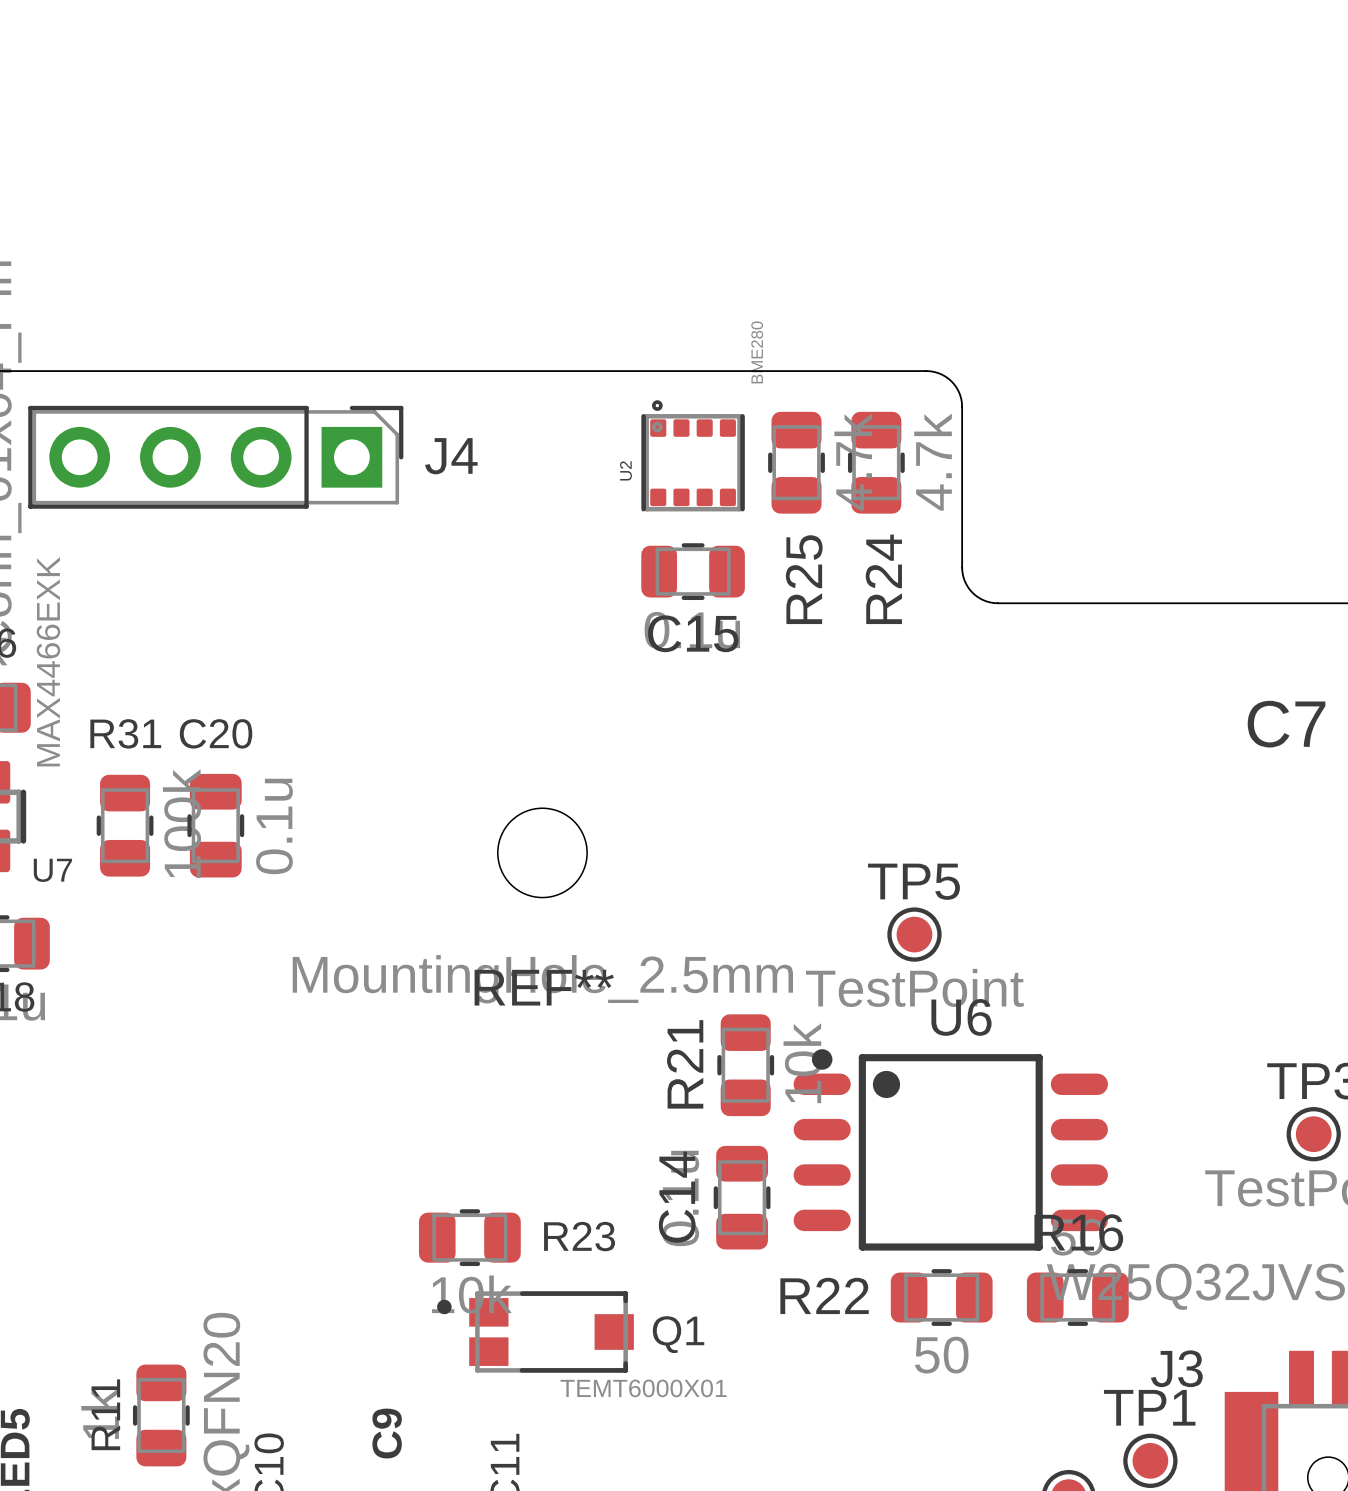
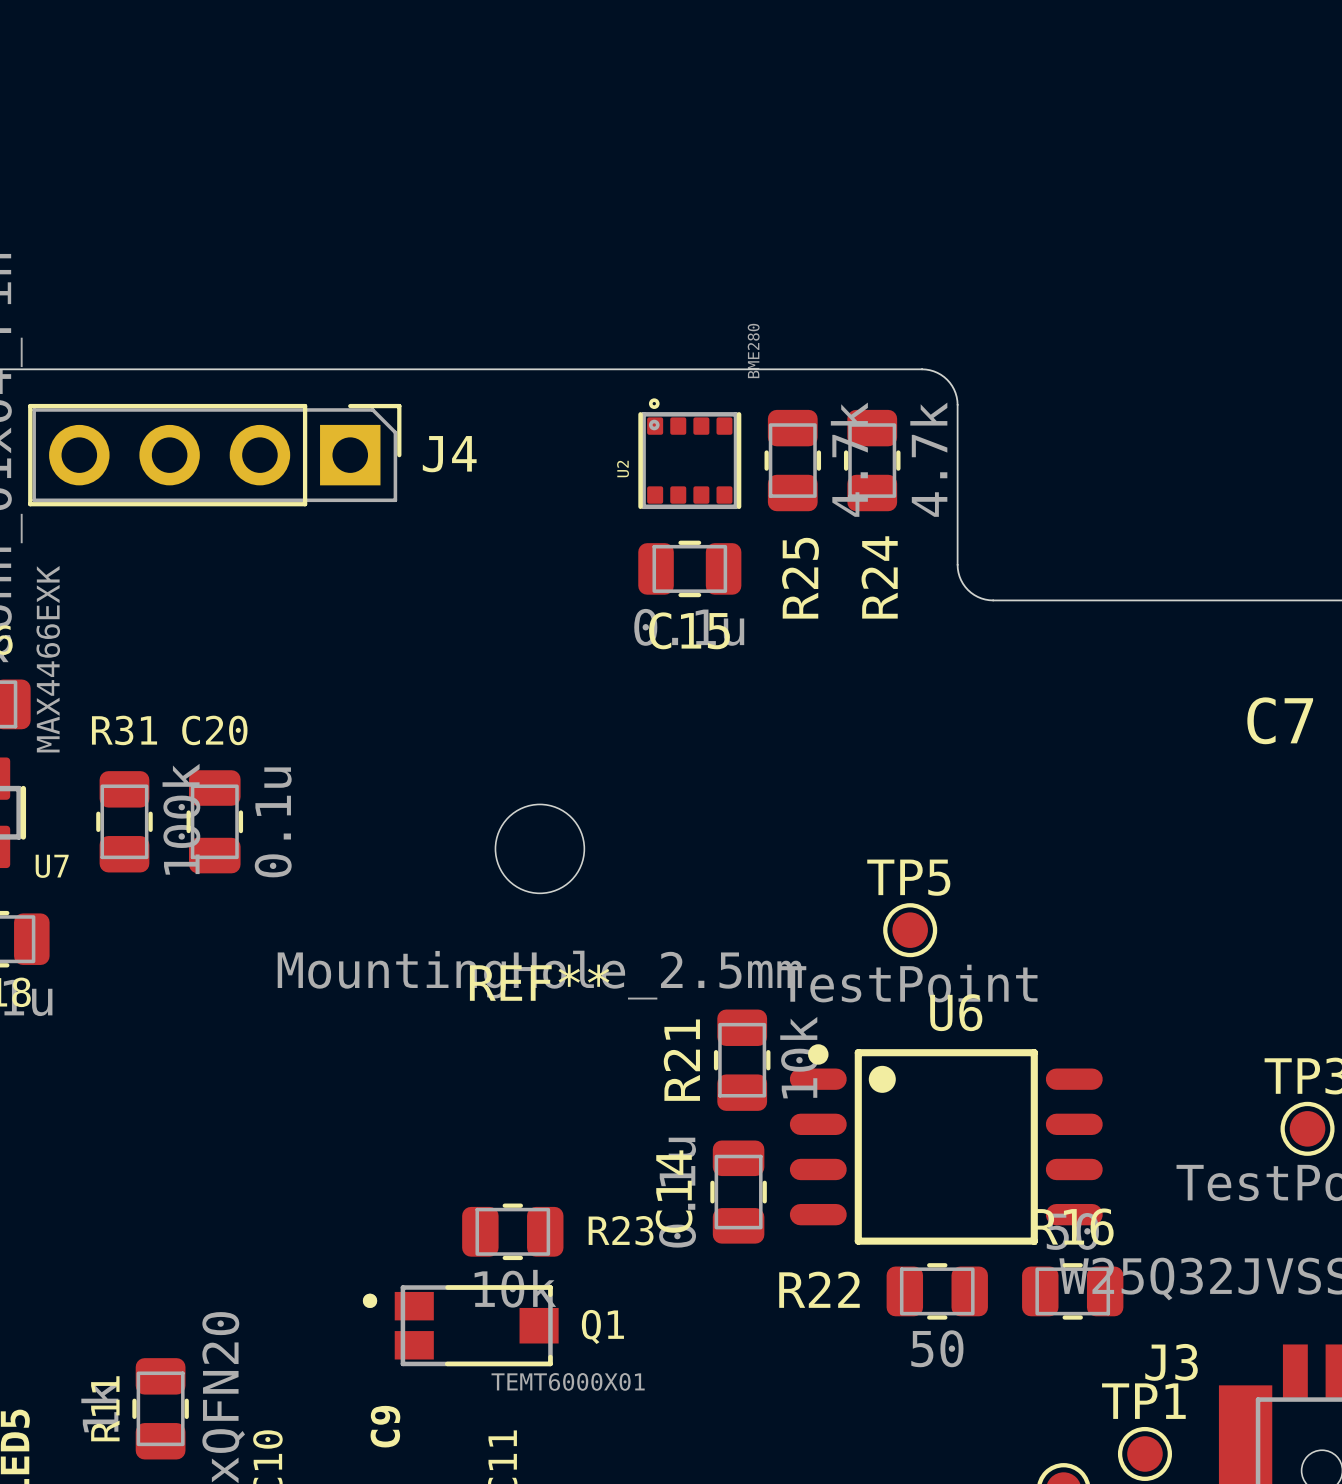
R23 position: (469, 1237) -> (512, 1231)
Q1 position: (535, 1332) -> (460, 1325)

